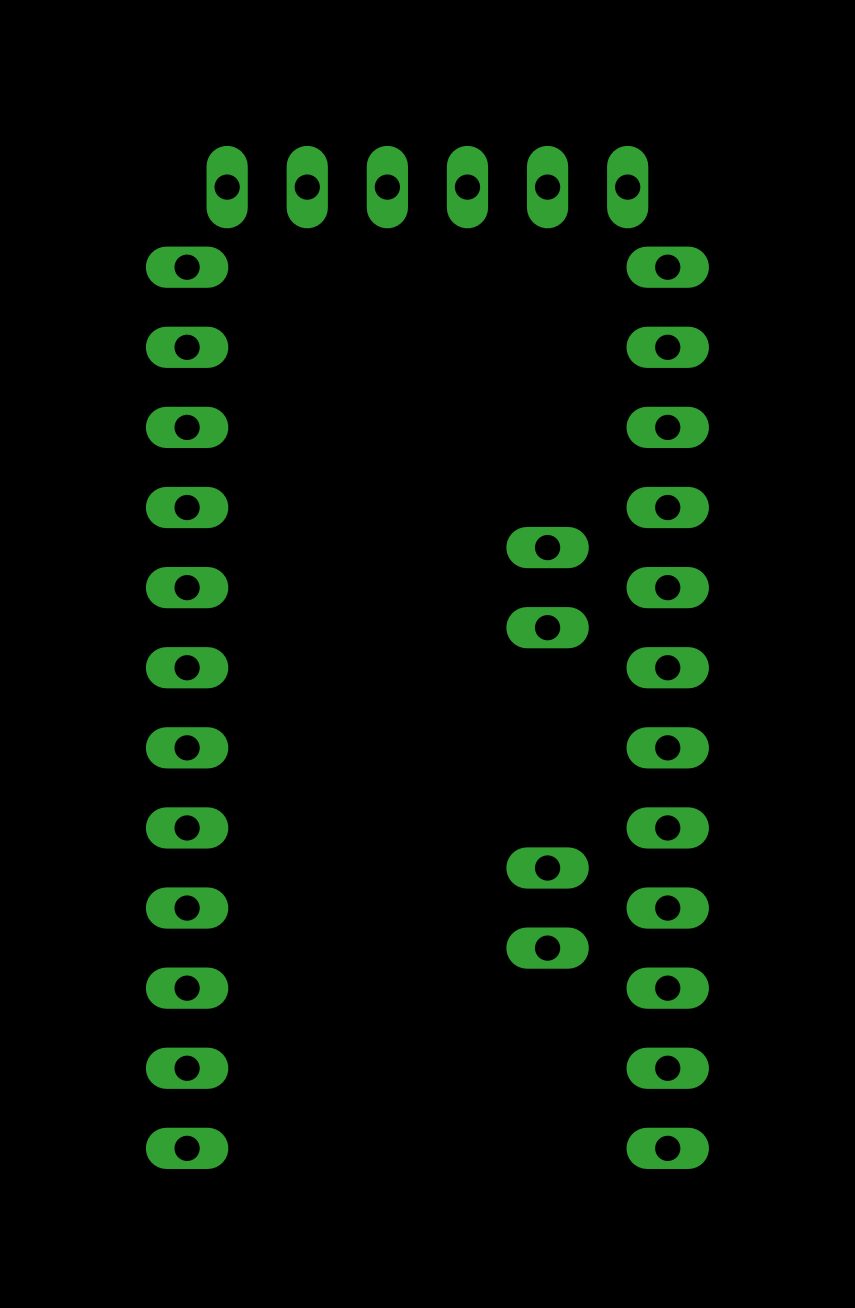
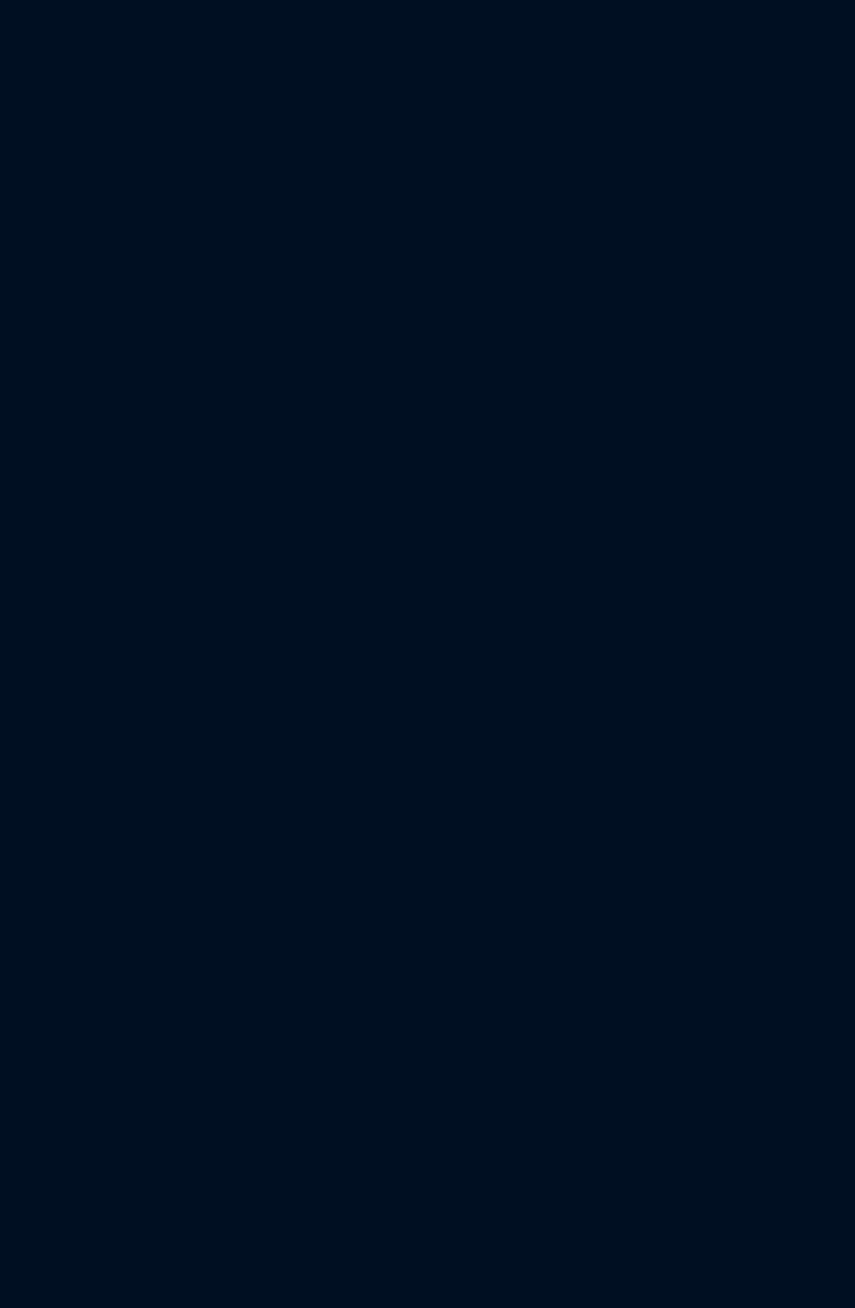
part: (427, 657) -> none

